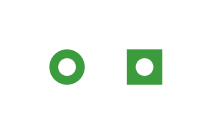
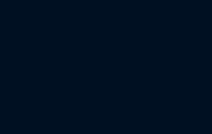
part: (105, 67) -> none

